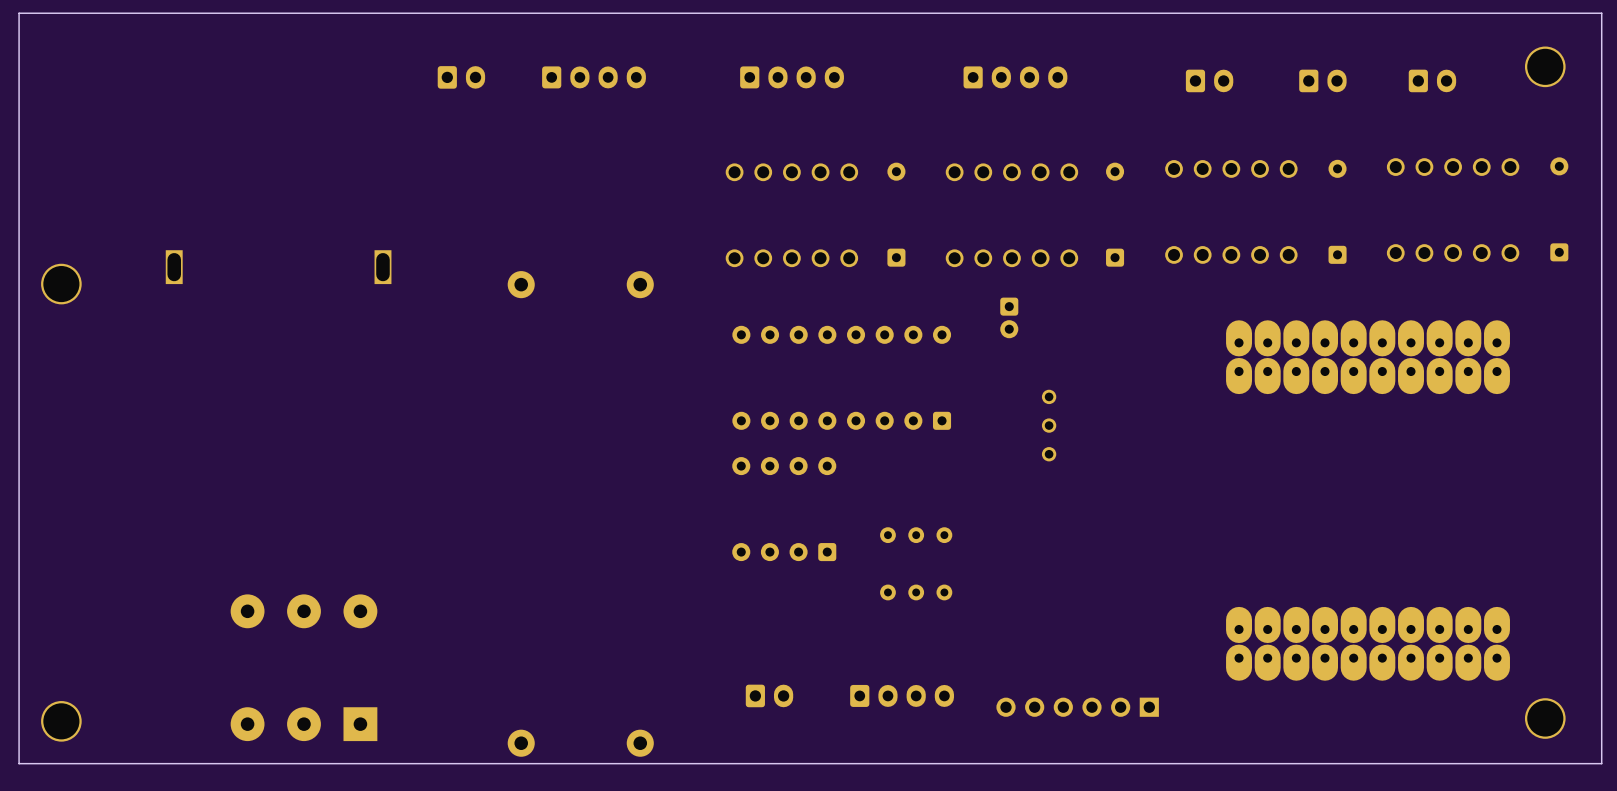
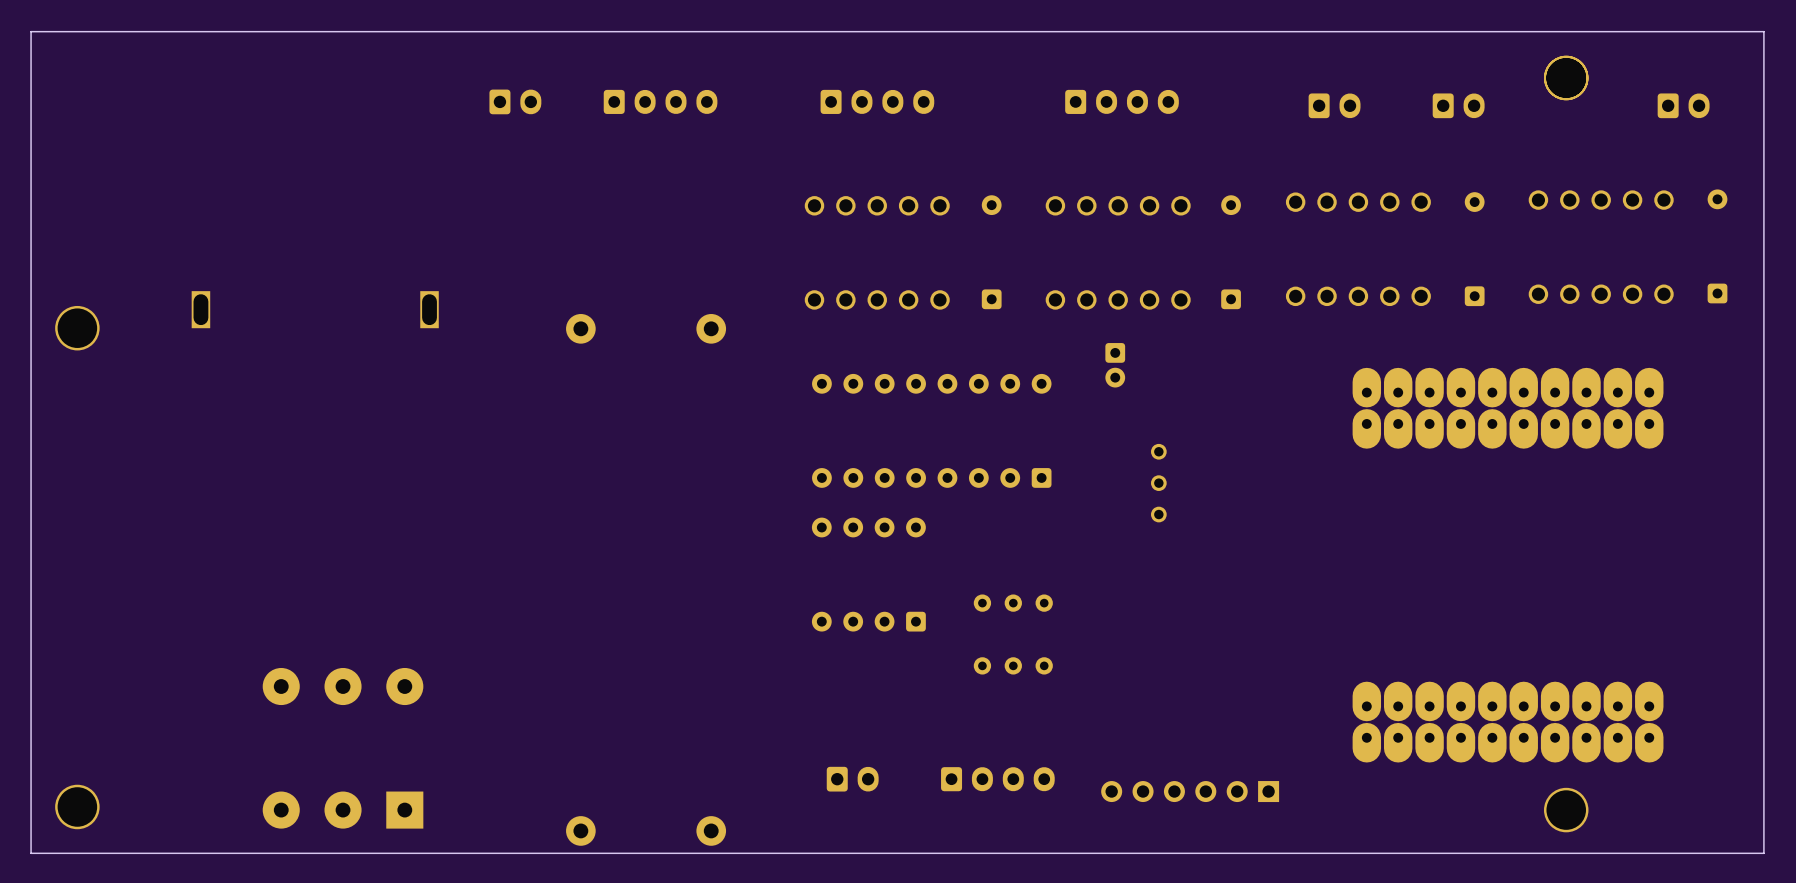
part position: (1545, 66) -> (1566, 78)
part position: (1432, 80) -> (1683, 105)
part position: (1545, 718) -> (1566, 810)

